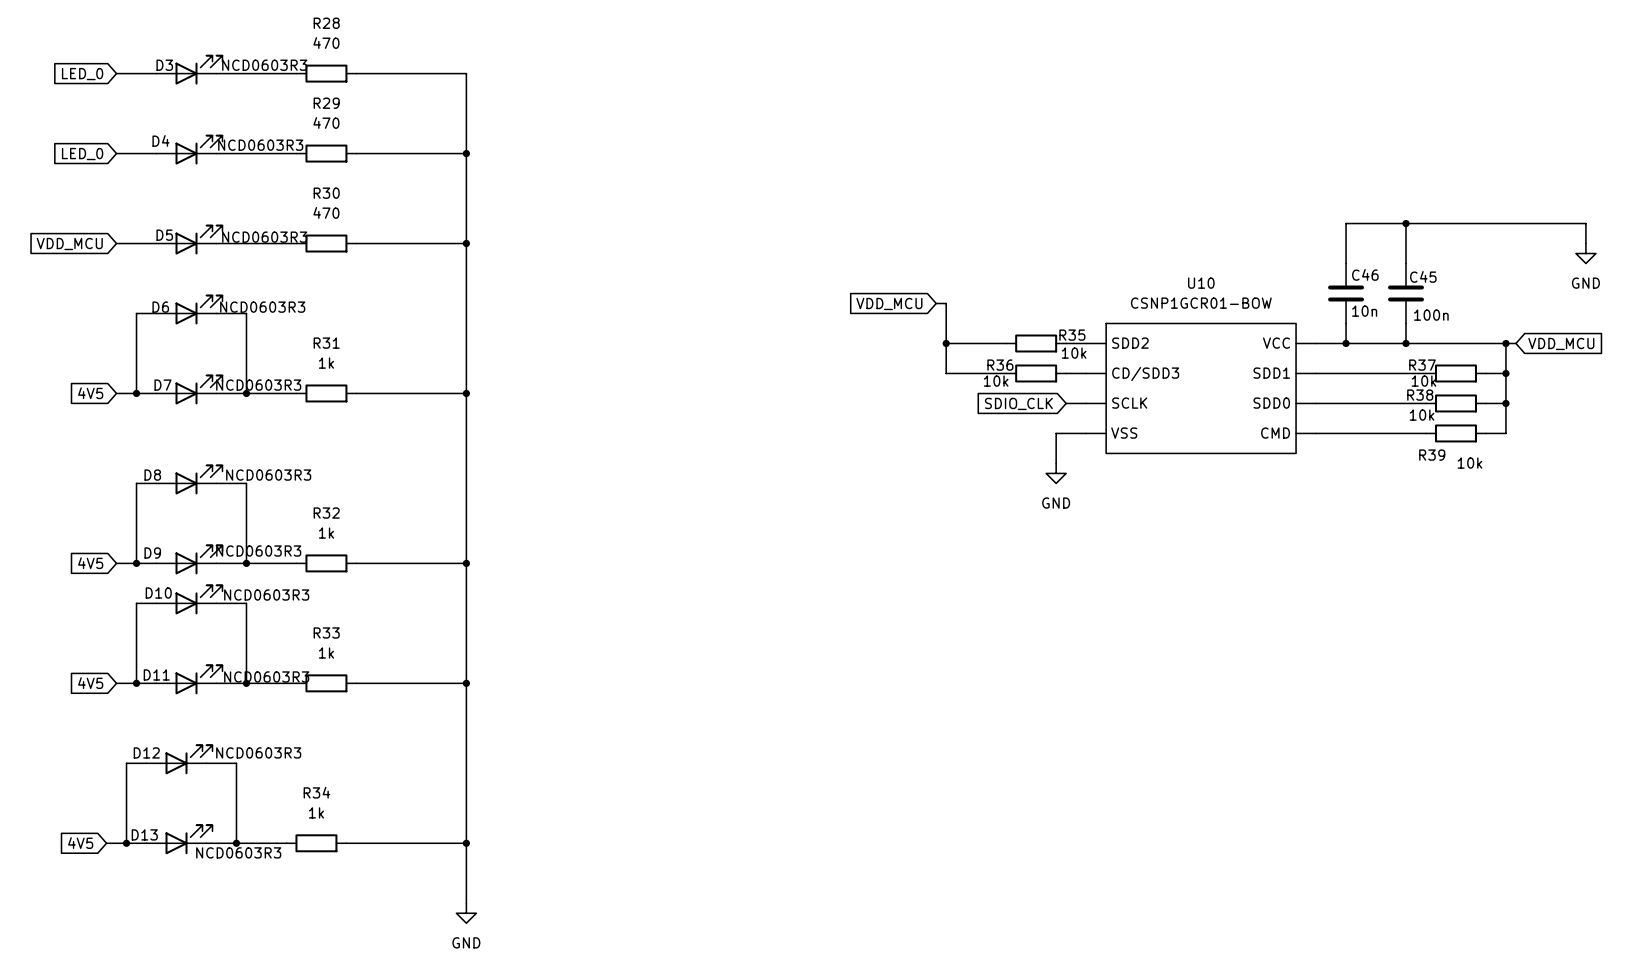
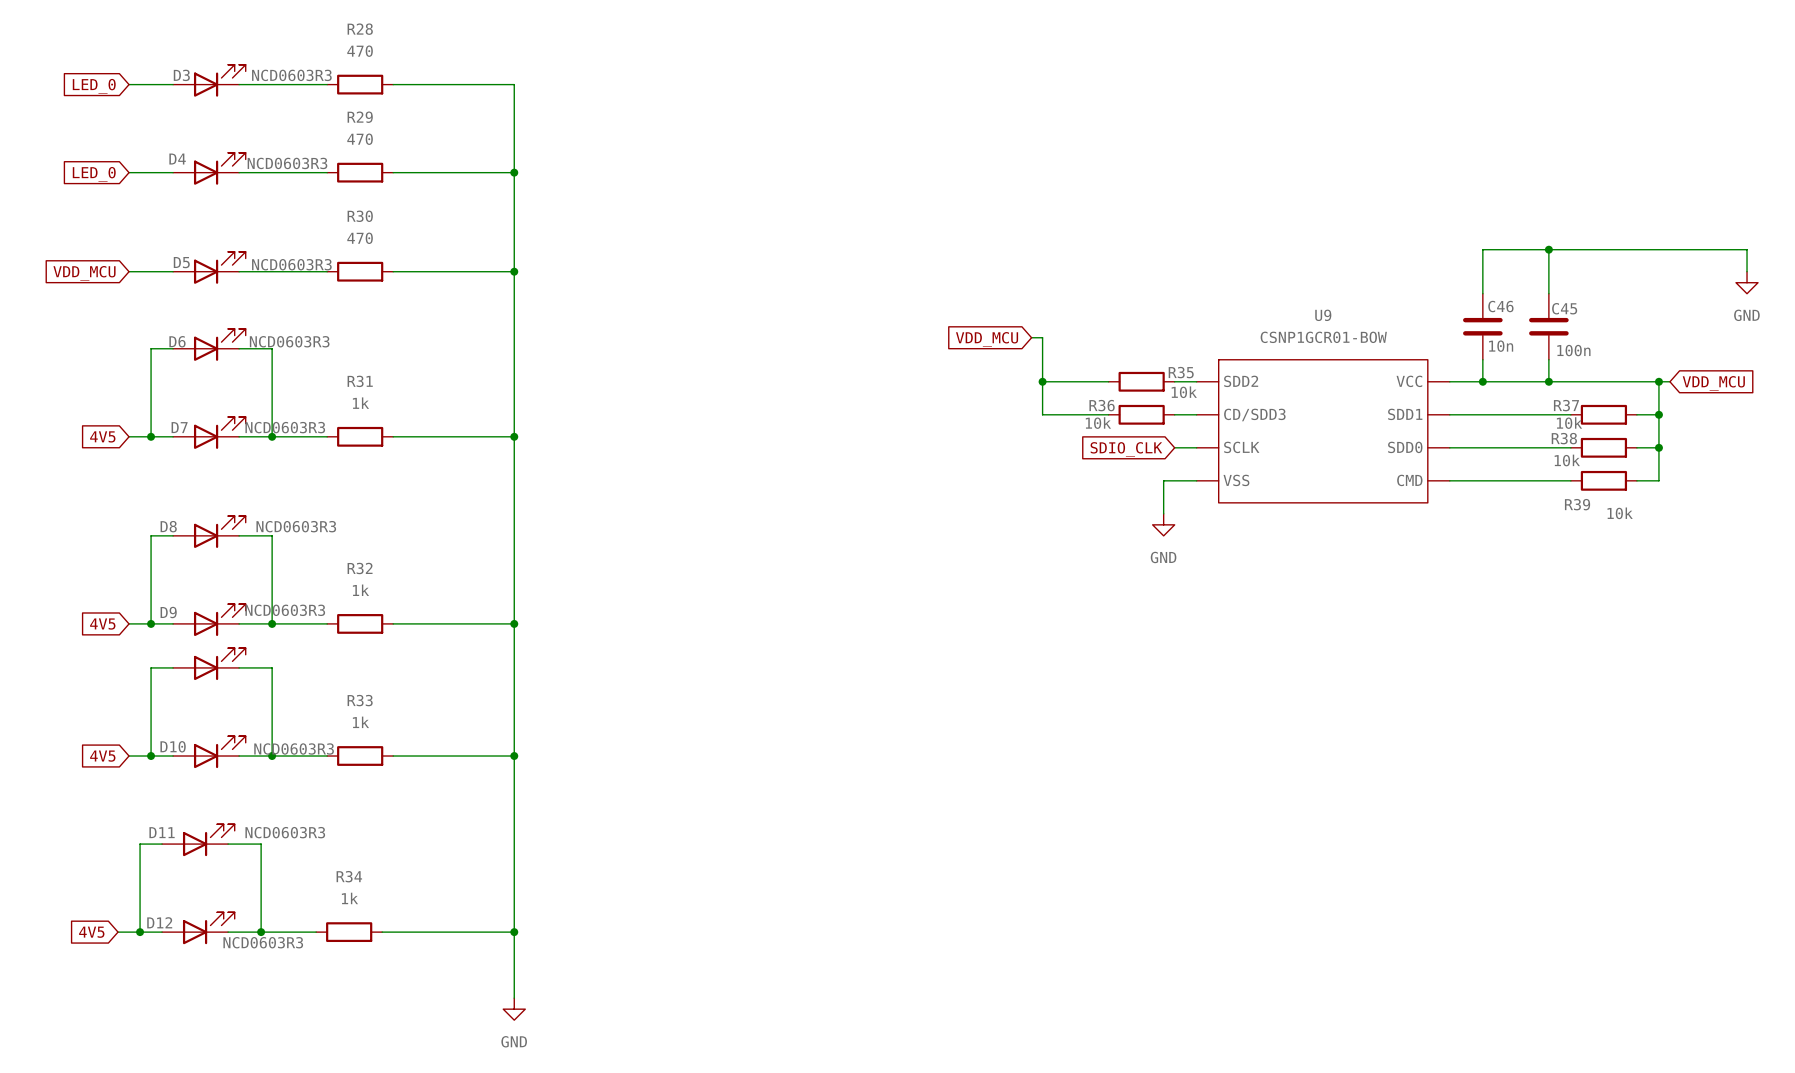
U10 name: U10 (1201, 283) -> U9 (1323, 315)
D10 name: D10 (158, 593) -> none
D10 value: NCD0603R3 (266, 595) -> none
D11 name: D11 (156, 674) -> D10 (173, 746)
D12 name: D12 (146, 752) -> D11 (162, 832)
D13 name: D13 (144, 834) -> D12 (159, 922)

